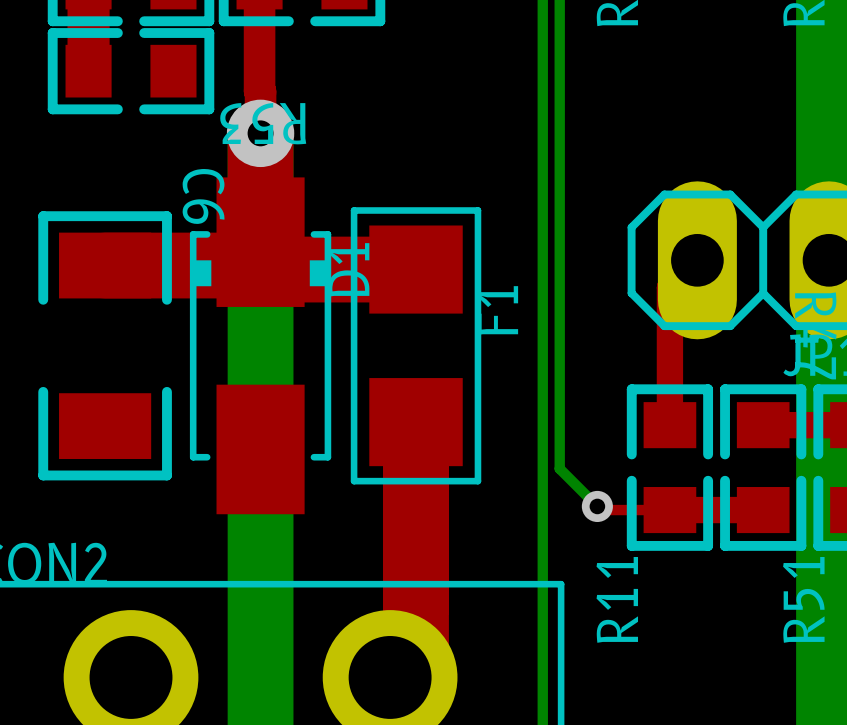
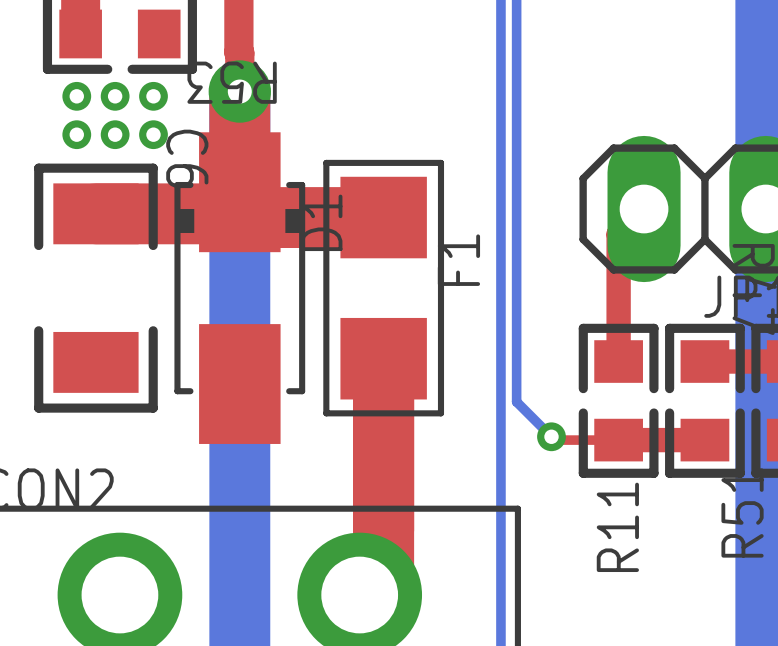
via: none -> (76, 96)
via: none -> (115, 96)
via: none -> (153, 96)
via: none -> (76, 134)
via: none -> (115, 134)
via: none -> (153, 134)
R11 name position: R11 (617, 599) -> R11 (617, 527)

